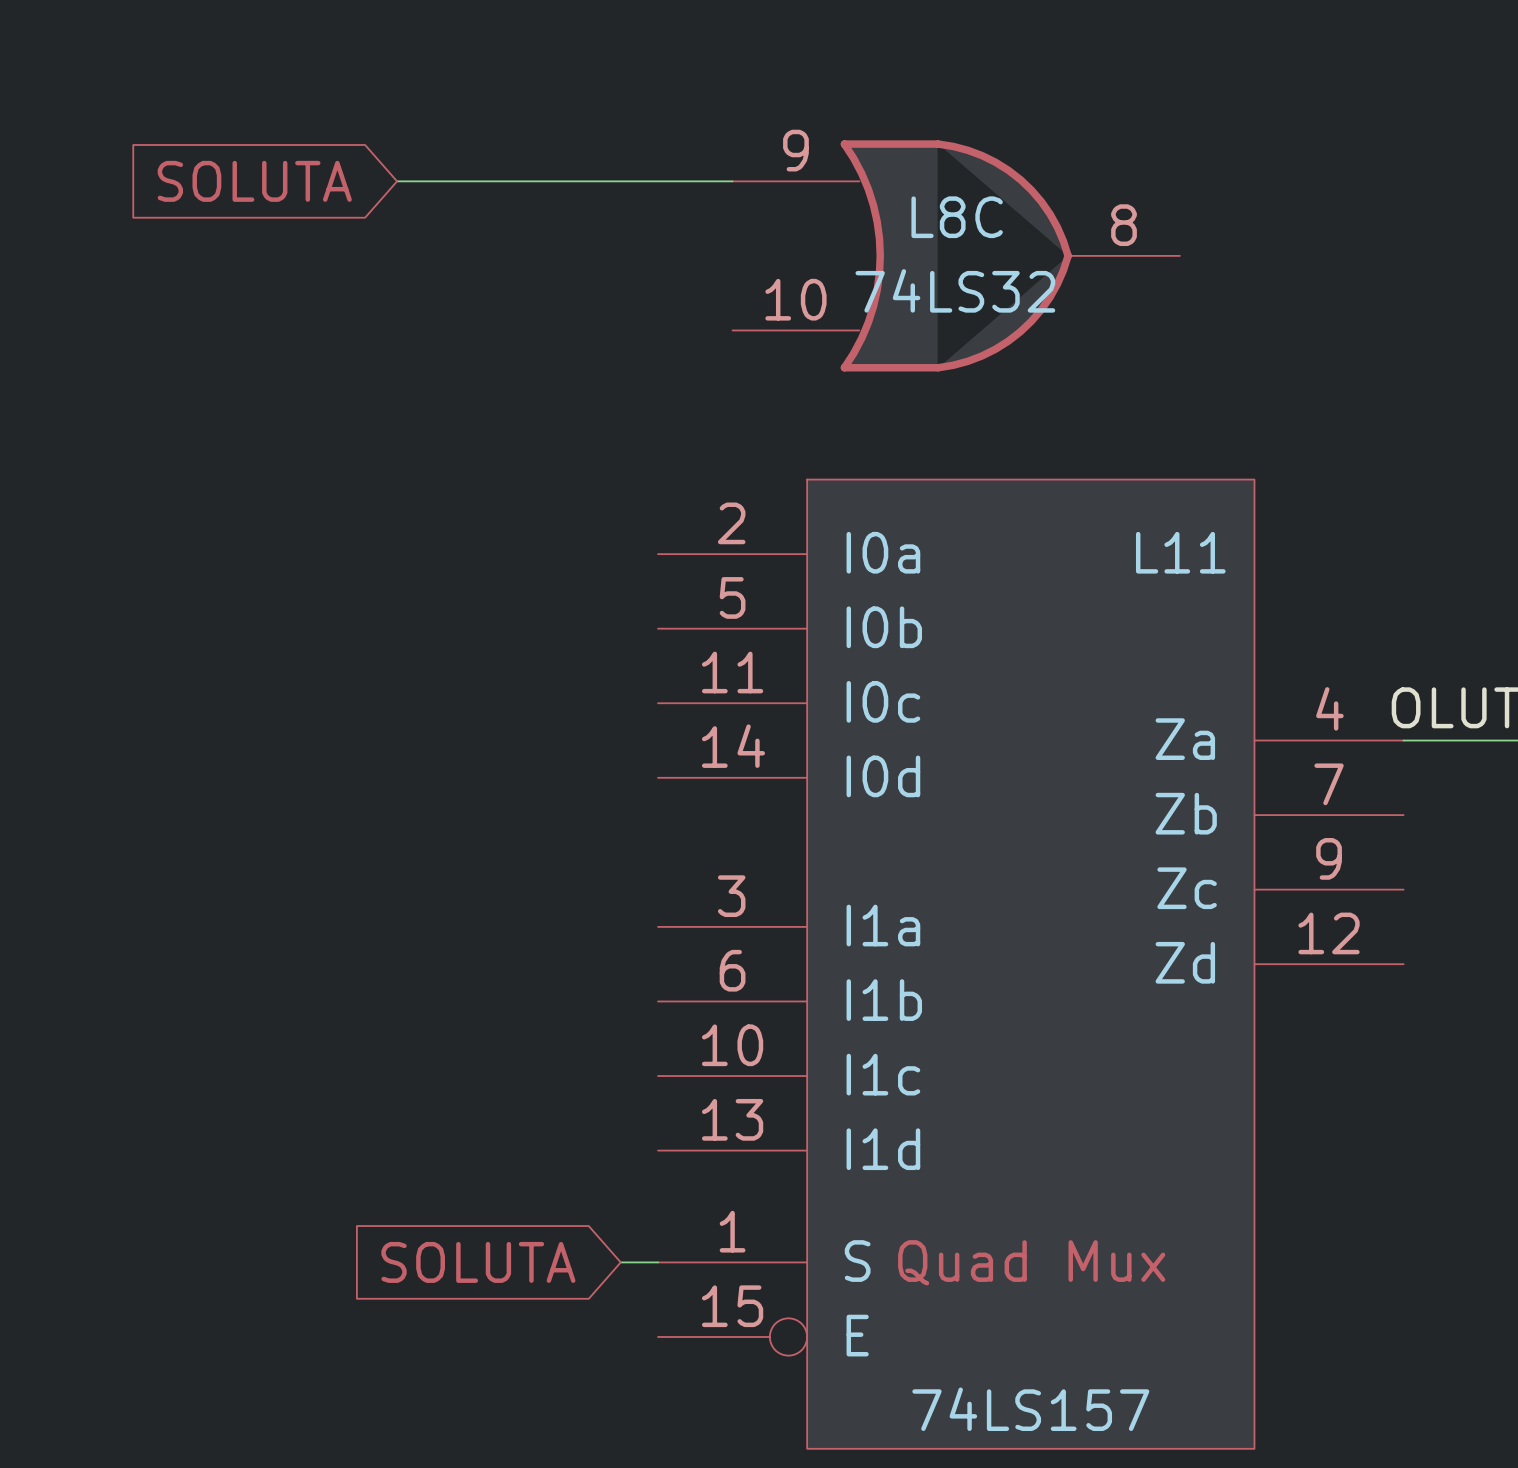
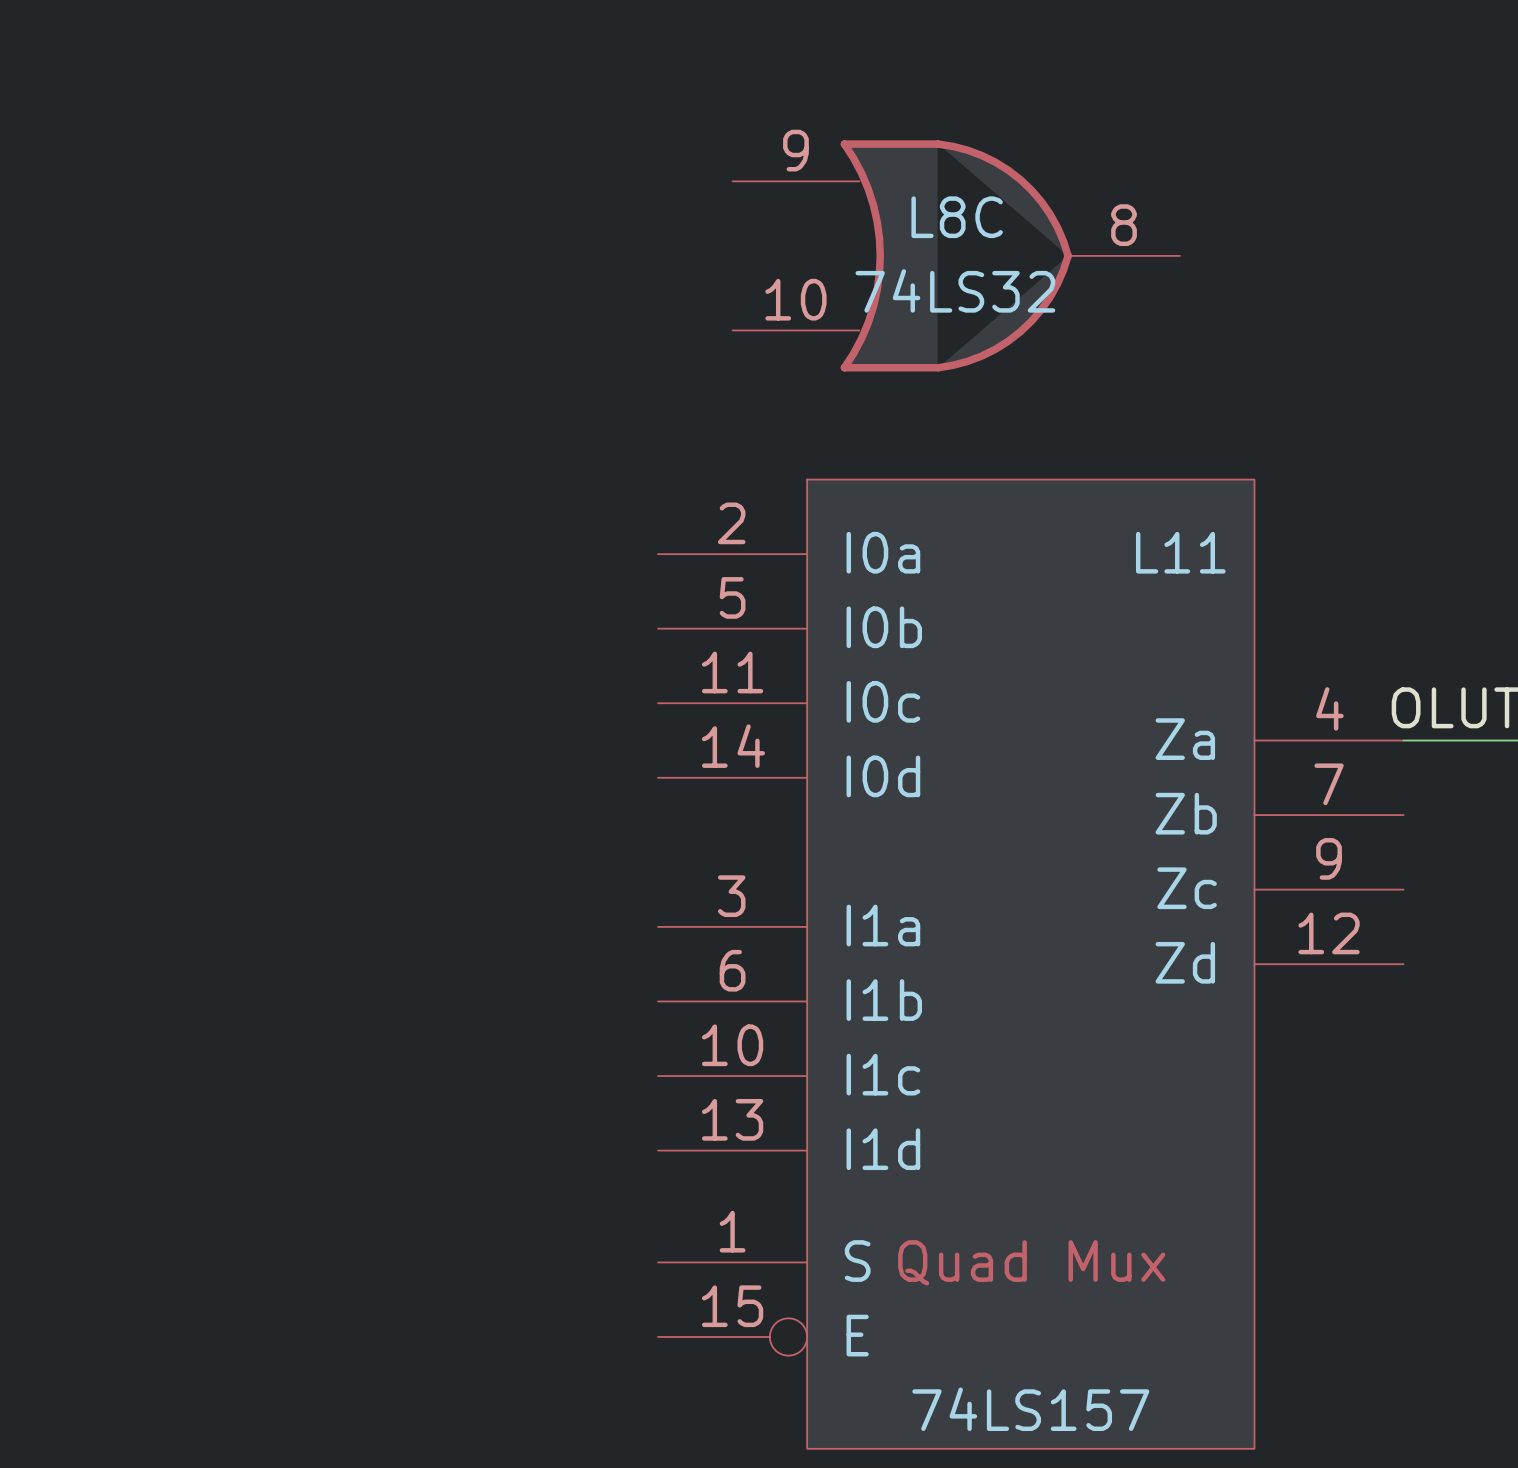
global label: SOLUTA (254, 181) -> none
wire: (397, 181) (732, 181) -> none
global label: SOLUTA (478, 1262) -> none
wire: (620, 1262) (658, 1262) -> none

